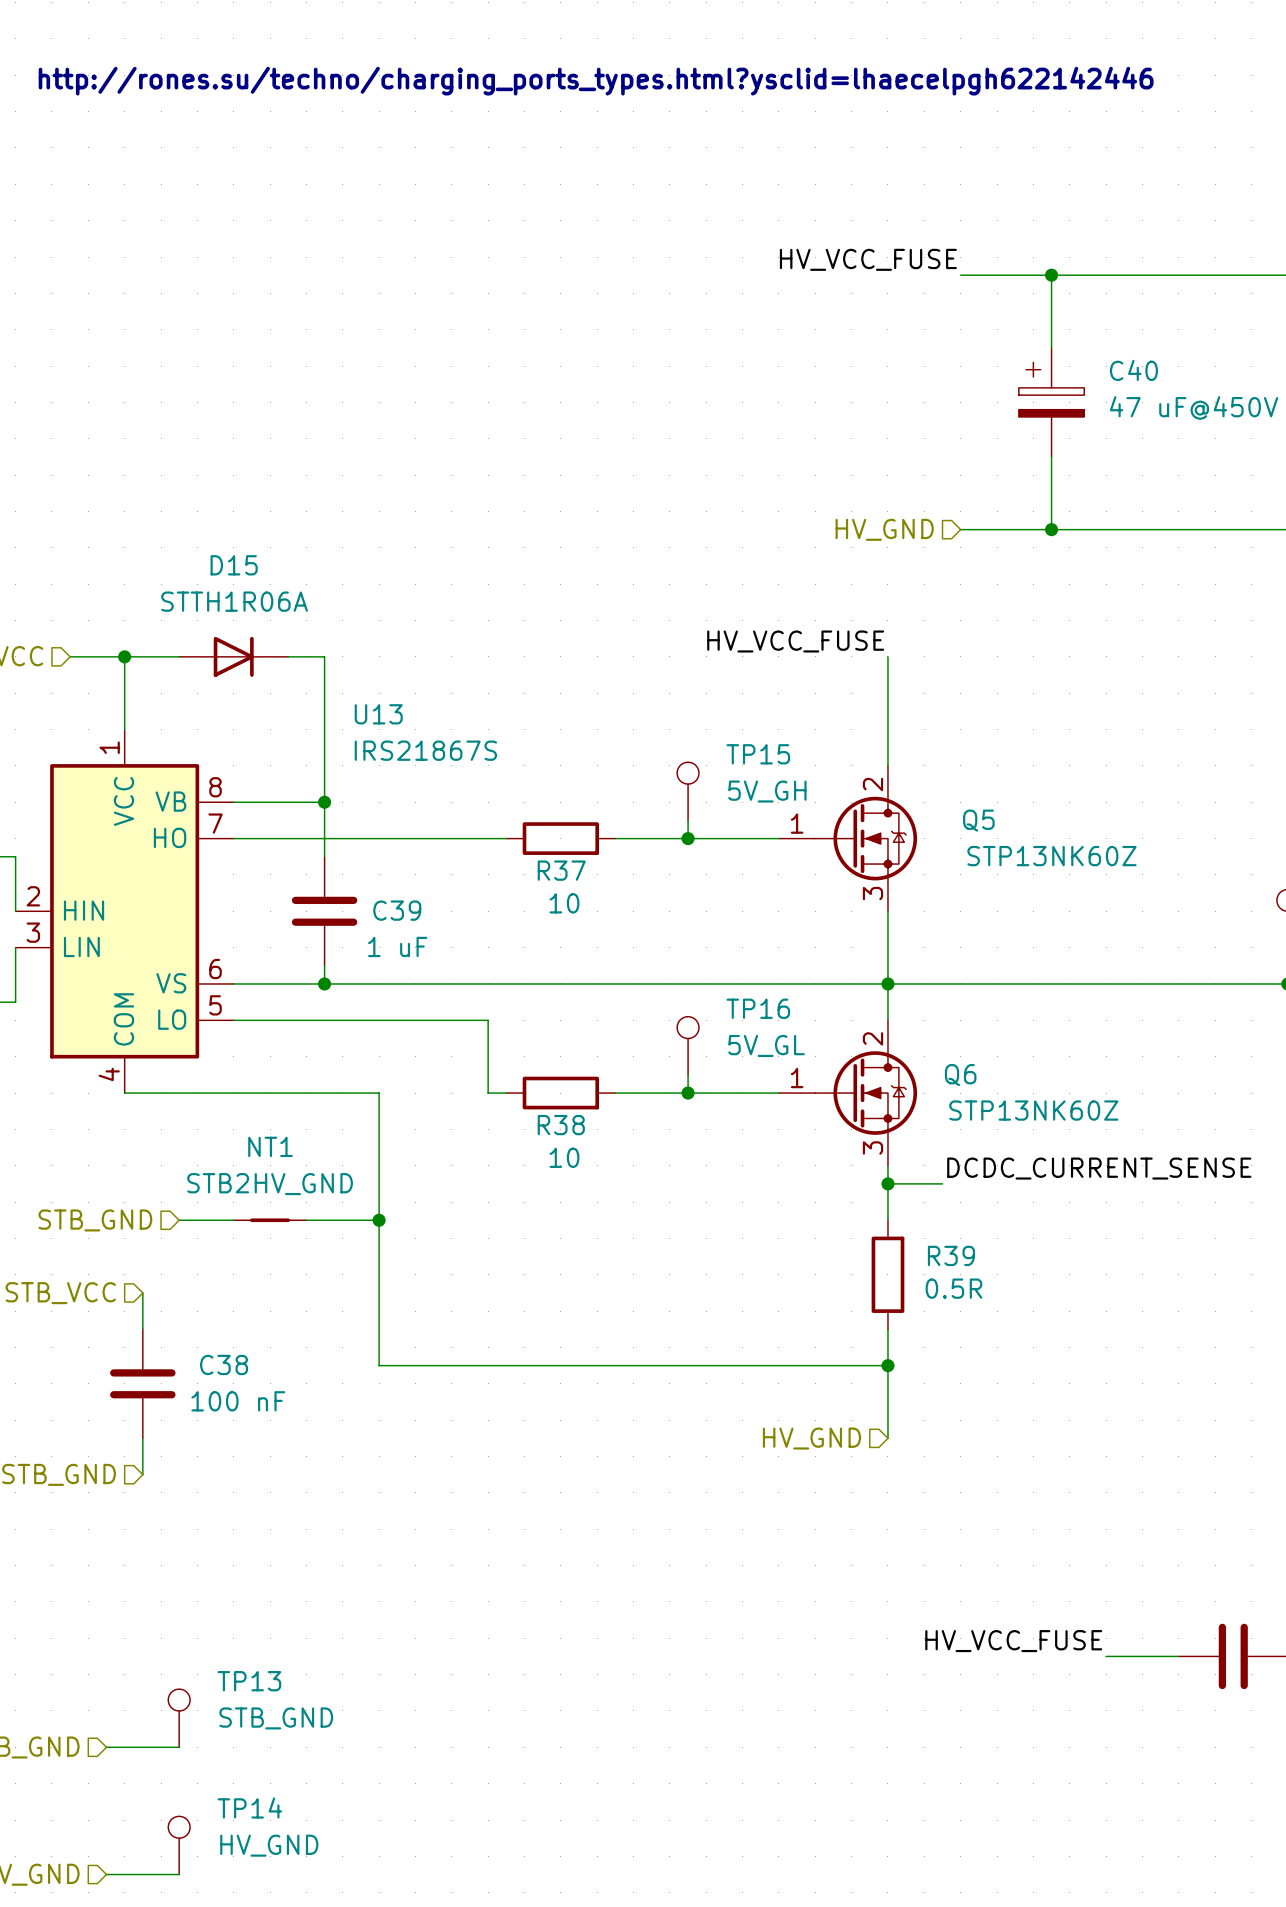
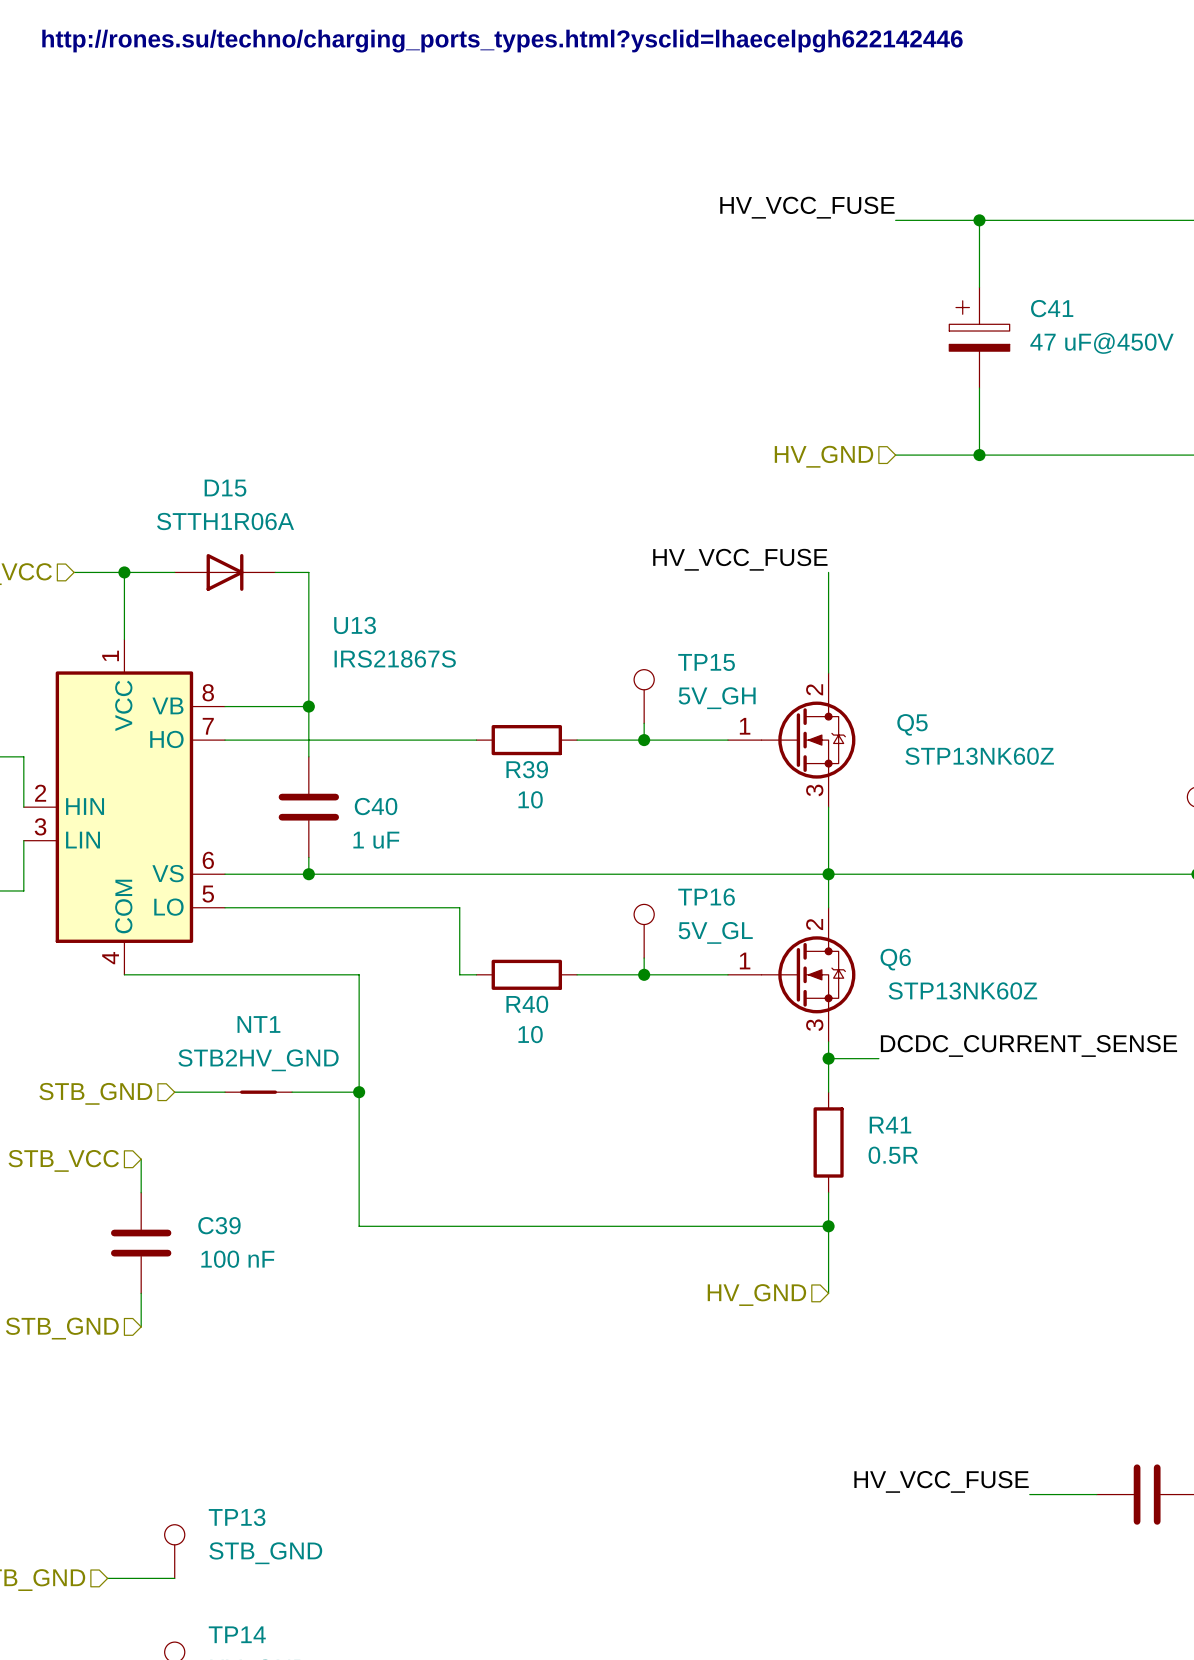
C40 name: C40 (1133, 370) -> C41 (1052, 308)
R37 name: R37 (561, 870) -> R39 (527, 769)
C39 name: C39 (397, 910) -> C40 (376, 806)
R38 name: R38 (561, 1125) -> R40 (527, 1004)
R39 name: R39 (951, 1255) -> R41 (890, 1125)
C38 name: C38 (224, 1364) -> C39 (219, 1225)

